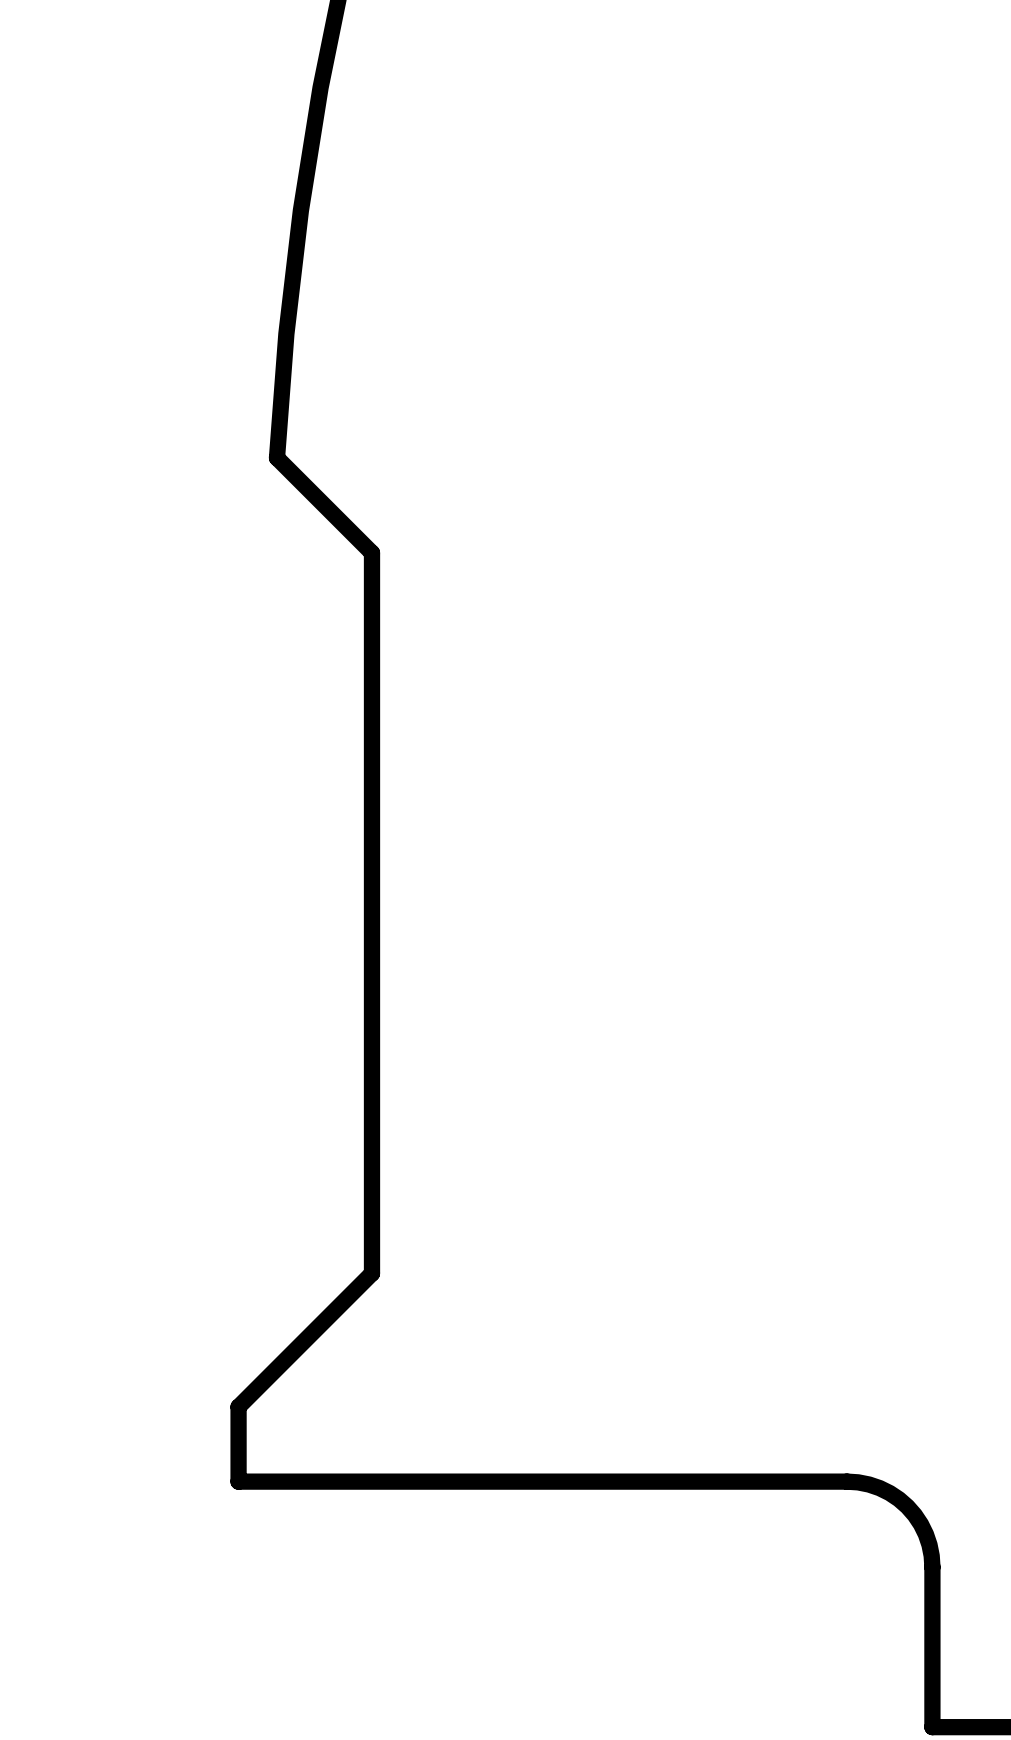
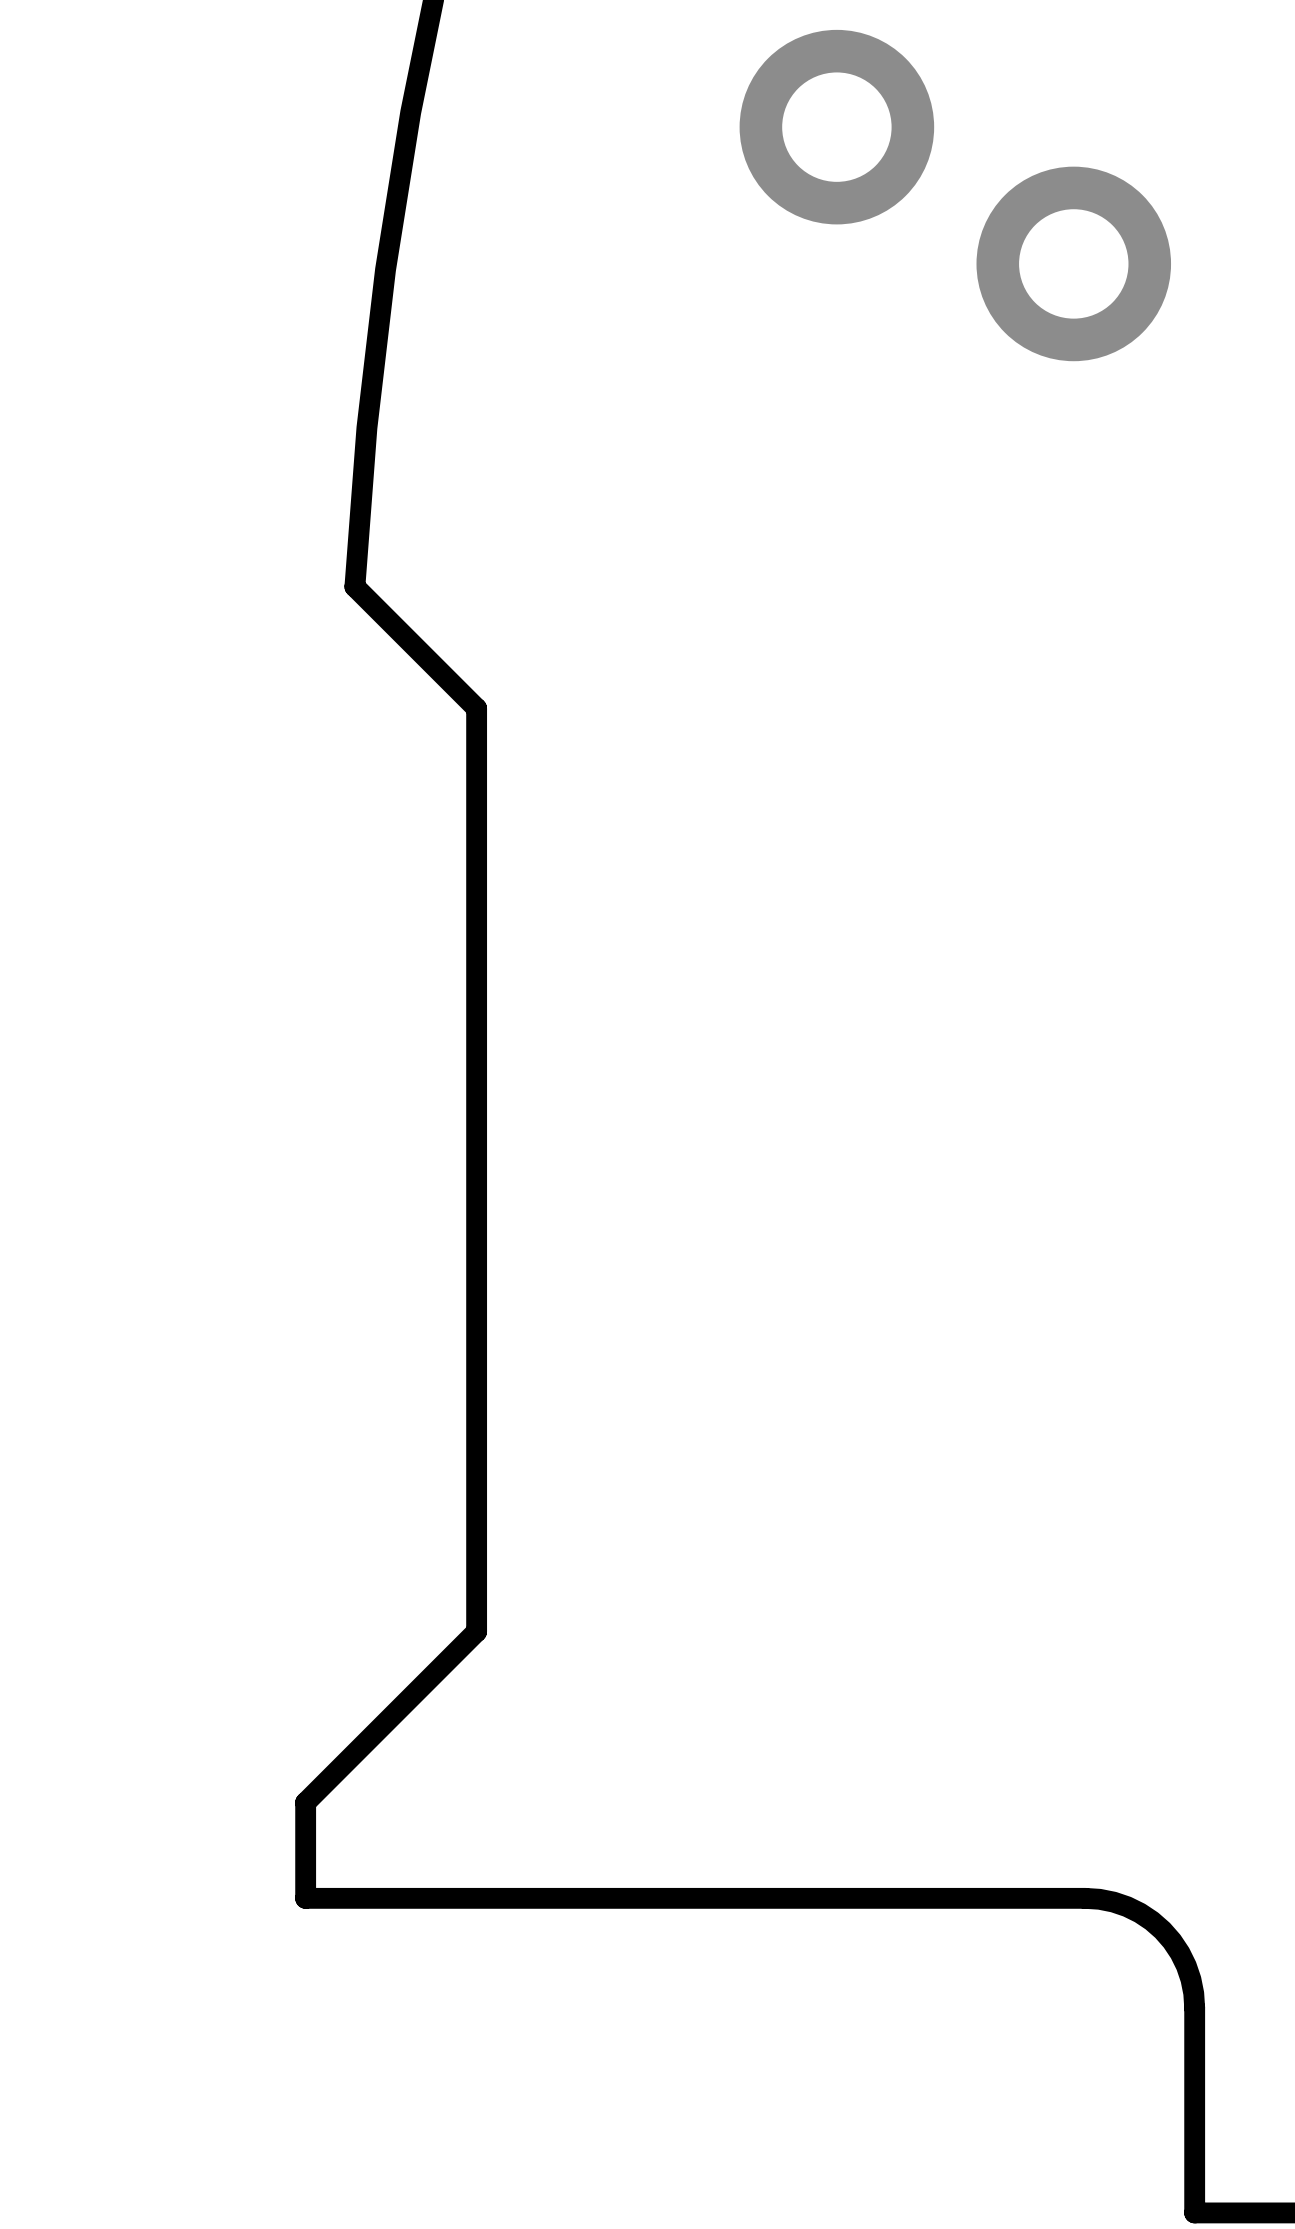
part: none -> (955, 195)

